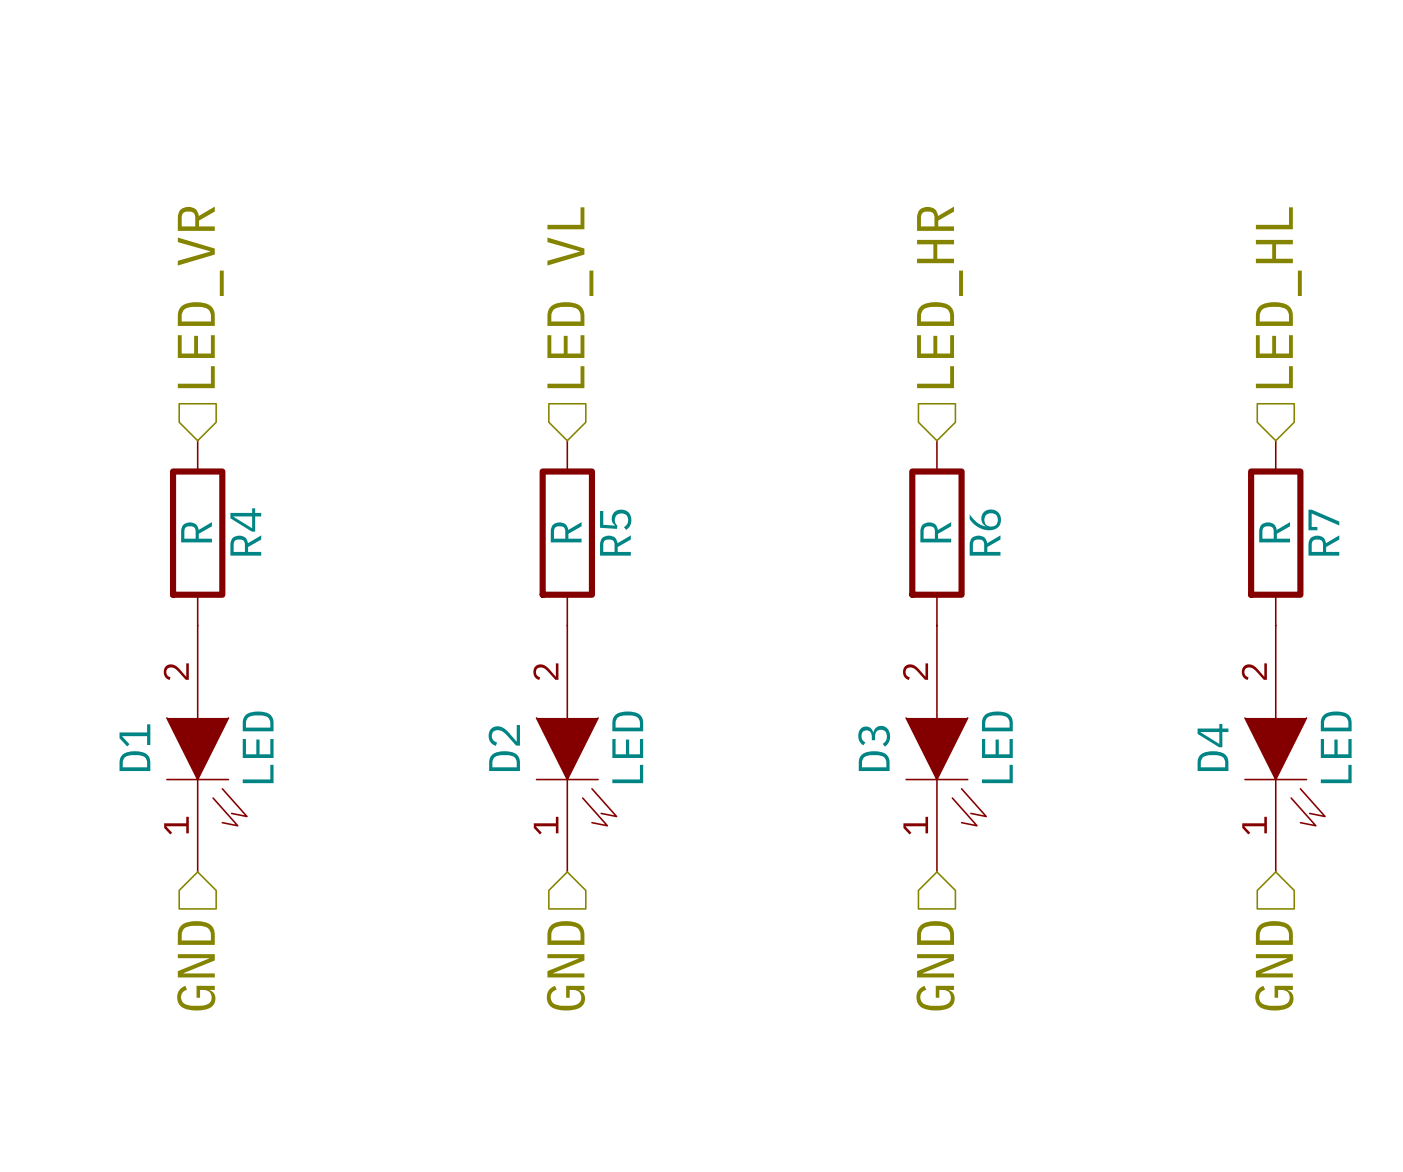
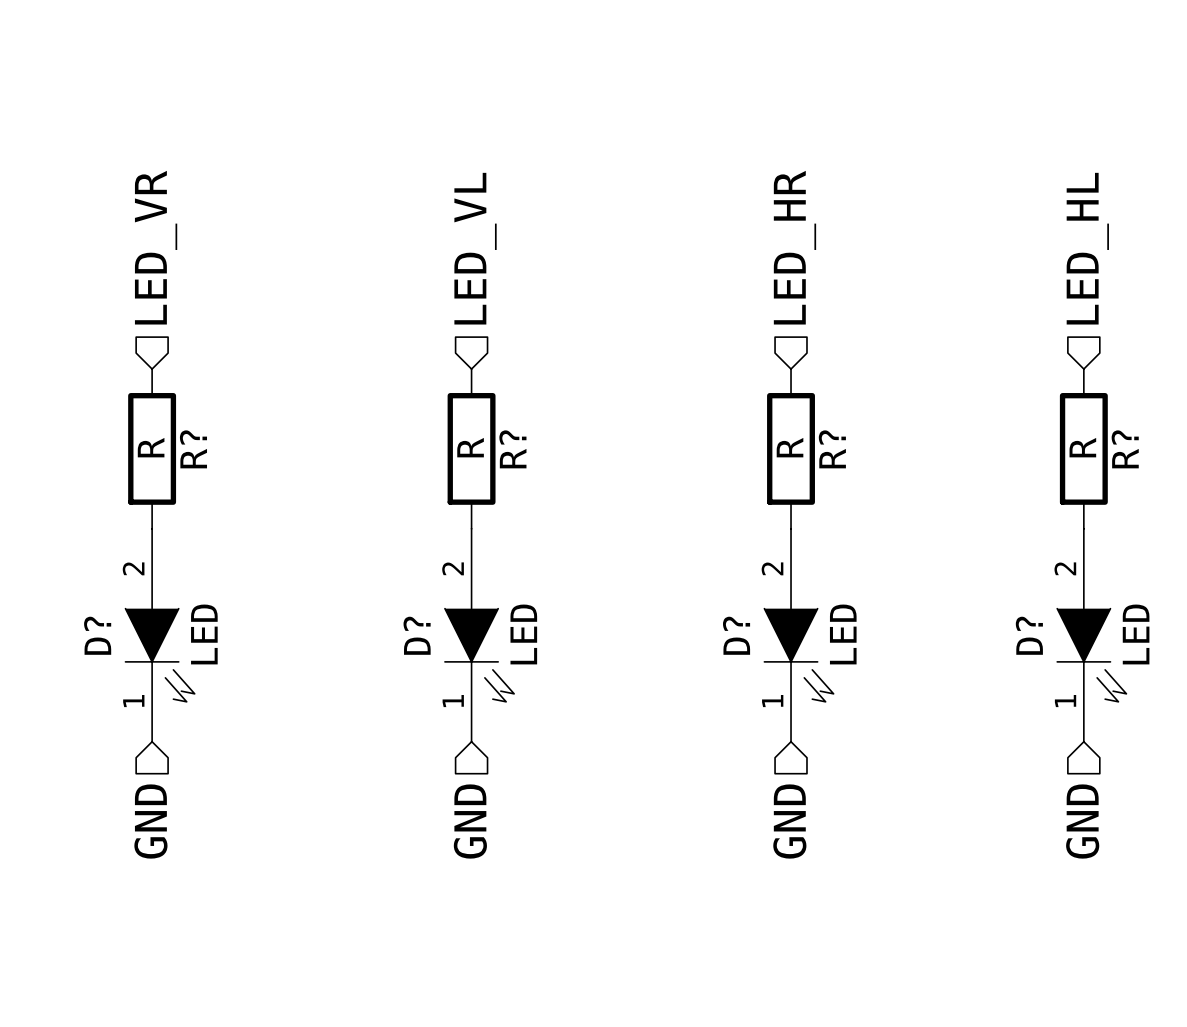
R4 name: R4 (245, 531) -> R? (193, 449)
R5 name: R5 (615, 532) -> R? (512, 449)
R6 name: R6 (985, 532) -> R? (832, 449)
R7 name: R7 (1323, 532) -> R? (1125, 449)
D1 name: D1 (134, 747) -> D? (97, 635)
D4 name: D4 (1213, 747) -> D? (1029, 635)
D2 name: D2 (504, 748) -> D? (417, 635)
D3 name: D3 (874, 748) -> D? (736, 635)

